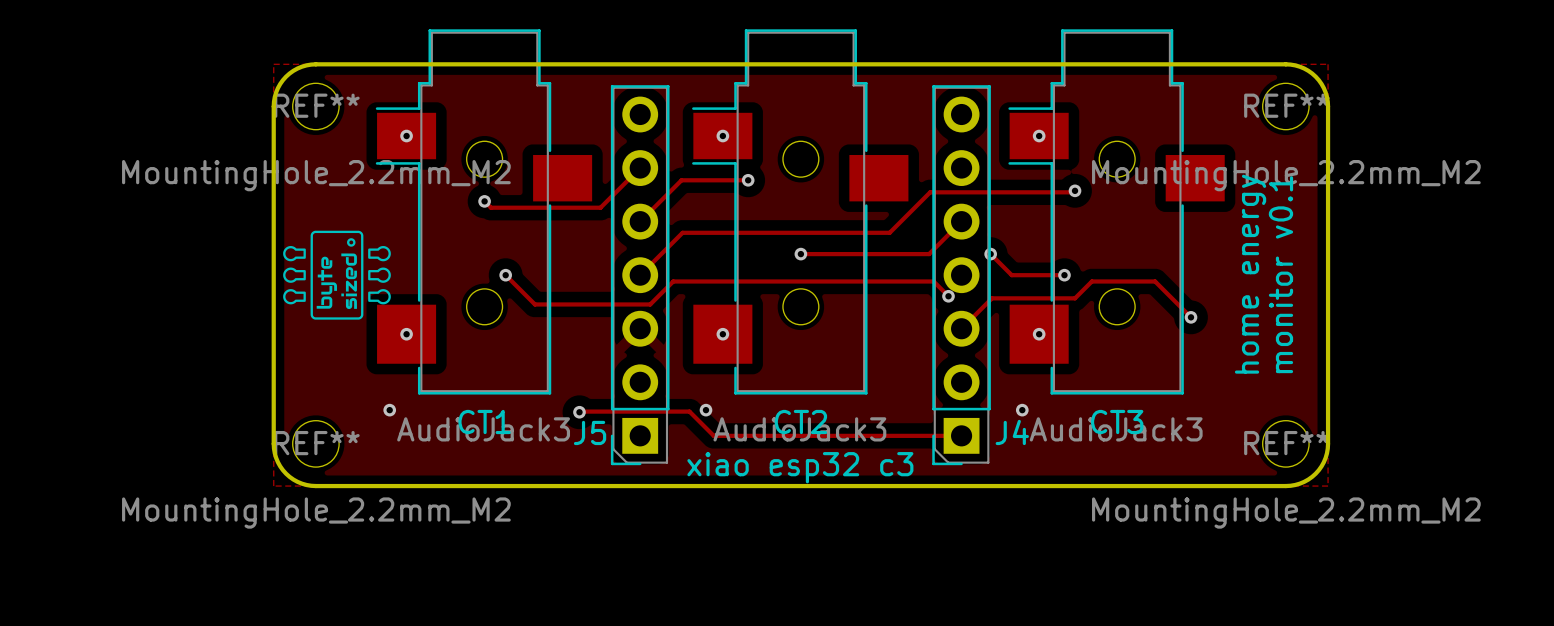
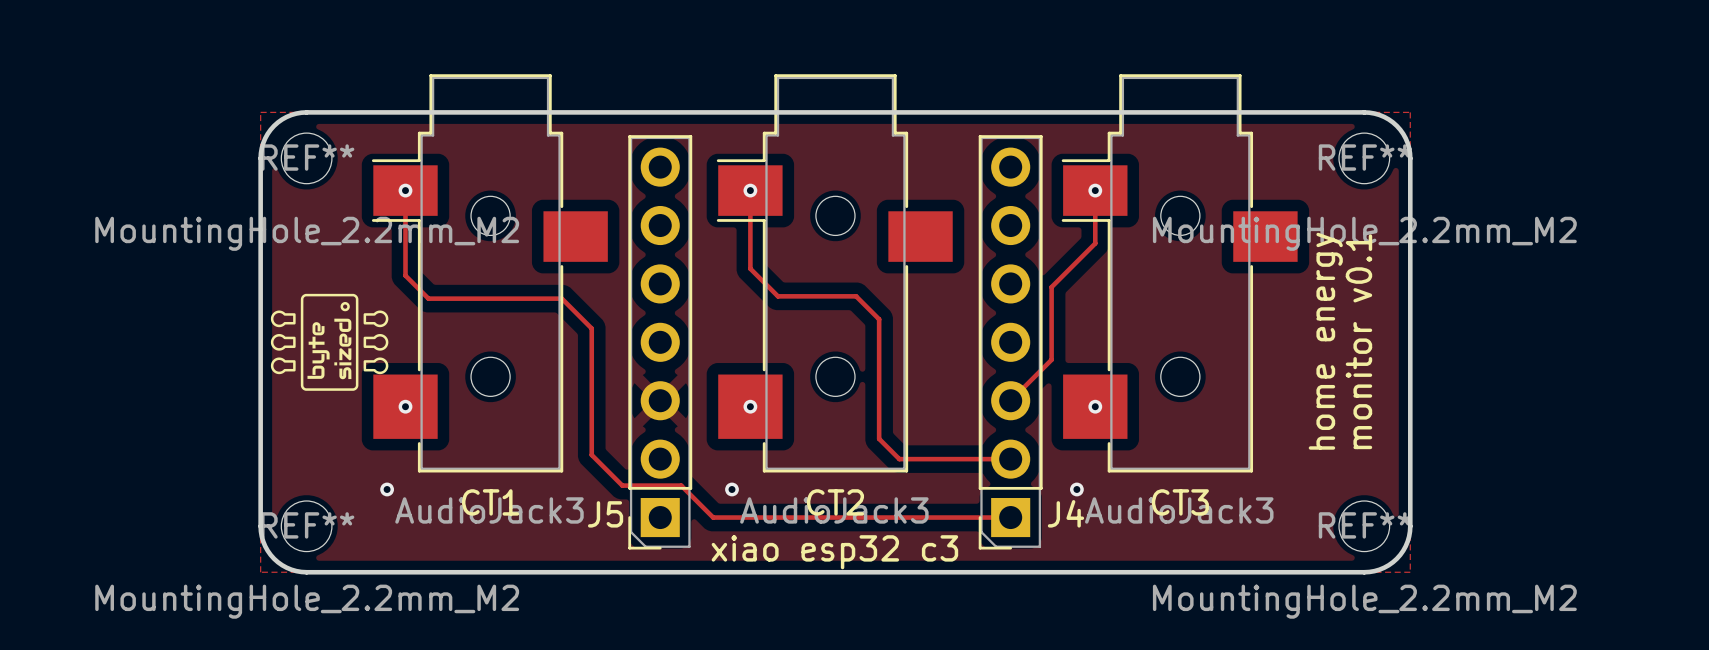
track: none -> (750, 190) (750, 268) (777, 296) (856, 296) (879, 319) (879, 438) (899, 459) (1010, 459)
track: (640, 168) (600, 207) (490, 207) (484, 201) -> none
track: (748, 180) (681, 180) (640, 221) -> none
via: (748, 180) -> none
track: (1075, 190) (930, 192) (889, 232) (682, 232) (640, 275) -> none
via: (1075, 190) -> none
via: (484, 201) -> none
track: (961, 221) (929, 254) (800, 254) -> none
via: (800, 254) -> none
track: (990, 254) (1011, 275) (1064, 275) -> none
via: (990, 254) -> none
track: (505, 275) (534, 304) (650, 304) (673, 281) (933, 281) (948, 296) -> none
via: (505, 275) -> none
via: (1064, 275) -> none
via: (948, 296) -> none
track: (991, 298) (1075, 298) (1091, 281) (1155, 281) (1190, 317) -> (1043, 367) (1051, 359) (1051, 287) (1095, 243) (1095, 190)
via: (1190, 317) -> none
track: (579, 412) (689, 411) (713, 435) -> (405, 190) (405, 275) (428, 298) (561, 298) (591, 328) (591, 454) (622, 485) (681, 485) (713, 517) (740, 517)
via: (579, 412) -> none

